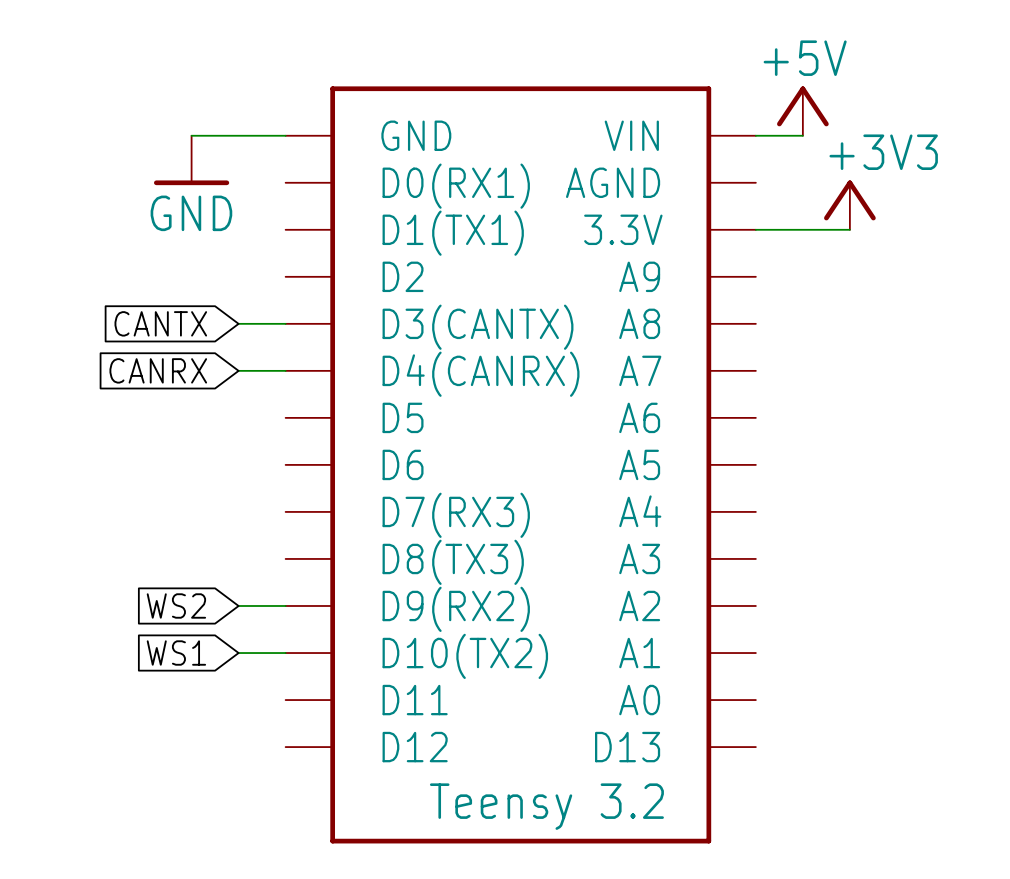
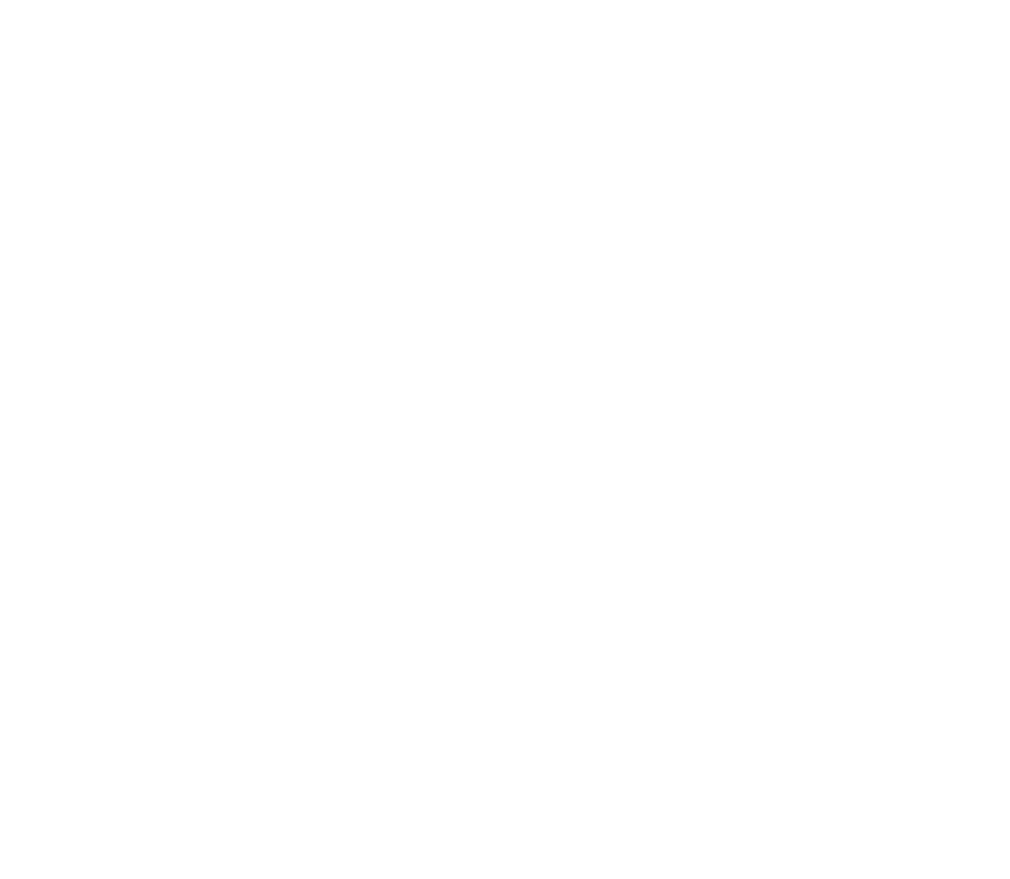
power symbol: +5V (802, 111) -> none
wire: (191, 135) (285, 135) -> none
wire: (755, 135) (802, 135) -> none
power symbol: GND (191, 160) -> none
power symbol: +3V3 (849, 205) -> none
wire: (755, 229) (849, 229) -> none
global label: CANTX (160, 323) -> none
wire: (238, 323) (285, 323) -> none
global label: CANRX (158, 370) -> none
wire: (238, 370) (285, 370) -> none
part: (520, 464) -> none
global label: WS2 (176, 605) -> none
wire: (238, 605) (285, 605) -> none
global label: WS1 (176, 653) -> none
wire: (238, 653) (285, 653) -> none

